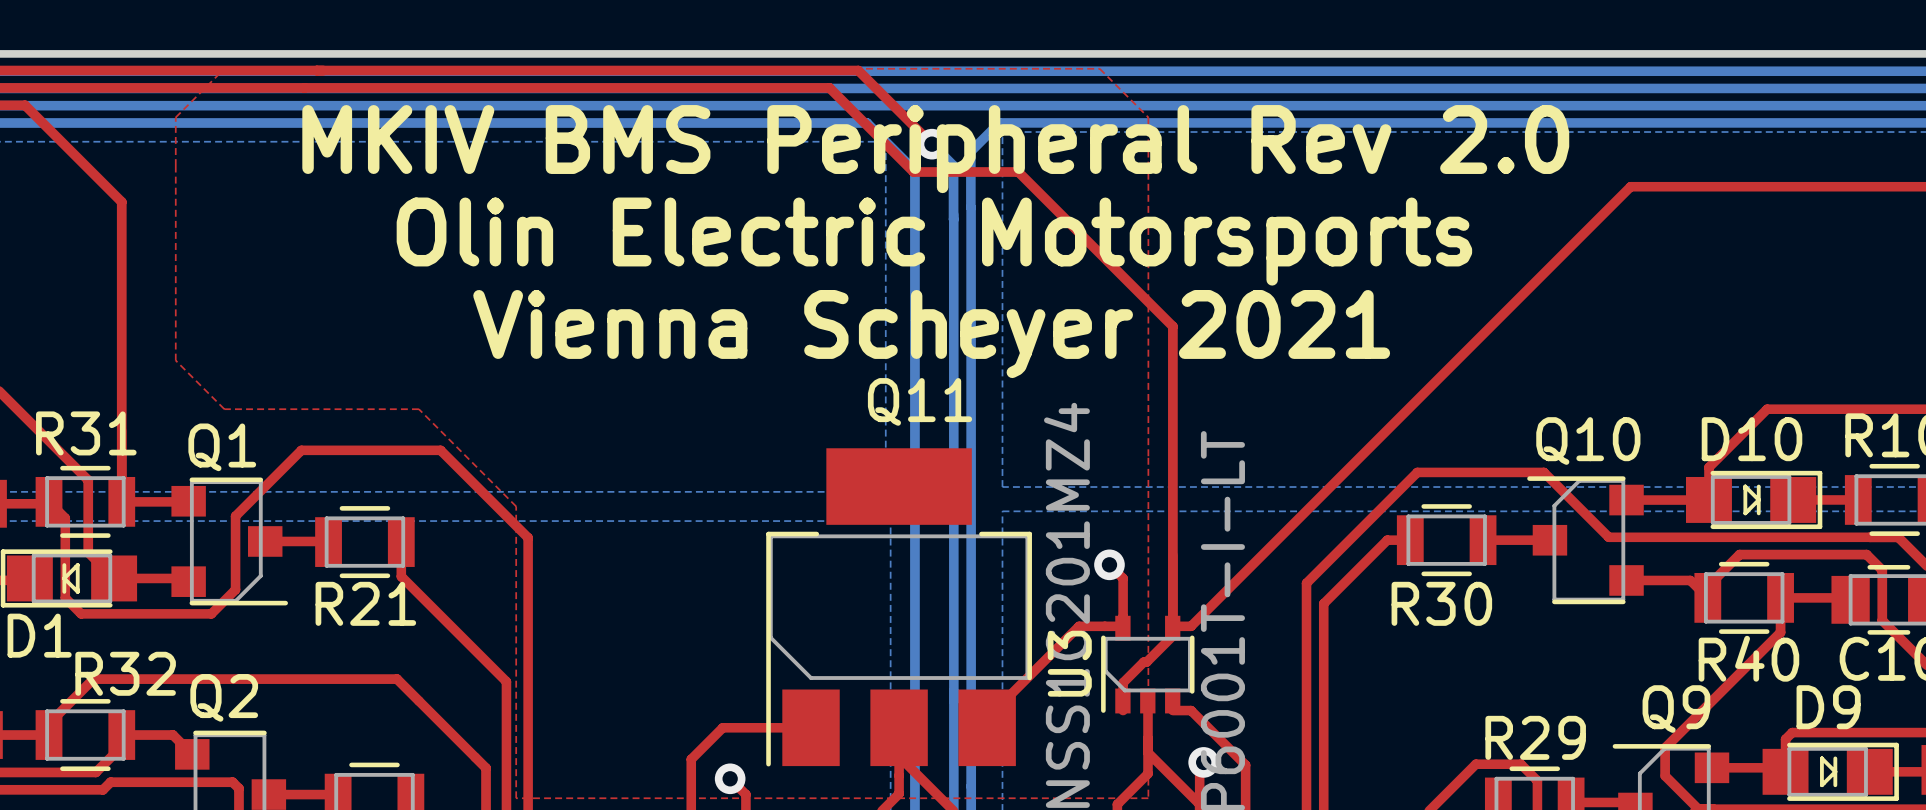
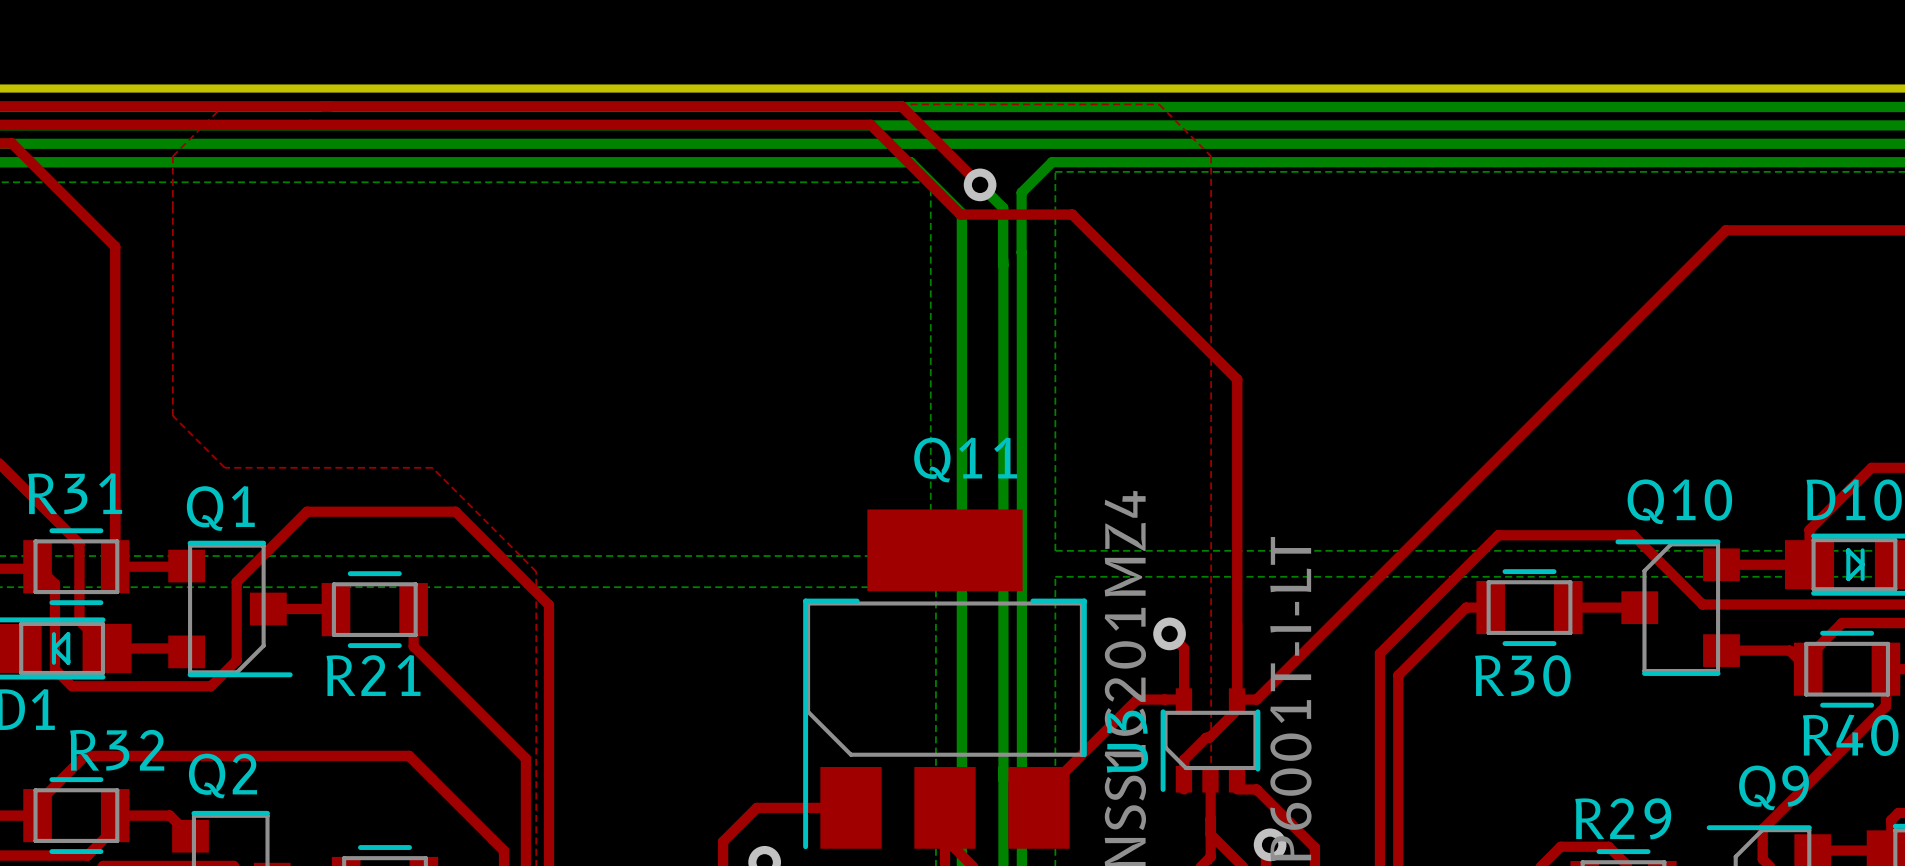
text: MKIV BMS Peripheral Rev 2.0 (935, 149) -> none
text: Olin Electric Motorsports (934, 241) -> none
text: Vienna Scheyer 2021 (931, 334) -> none

